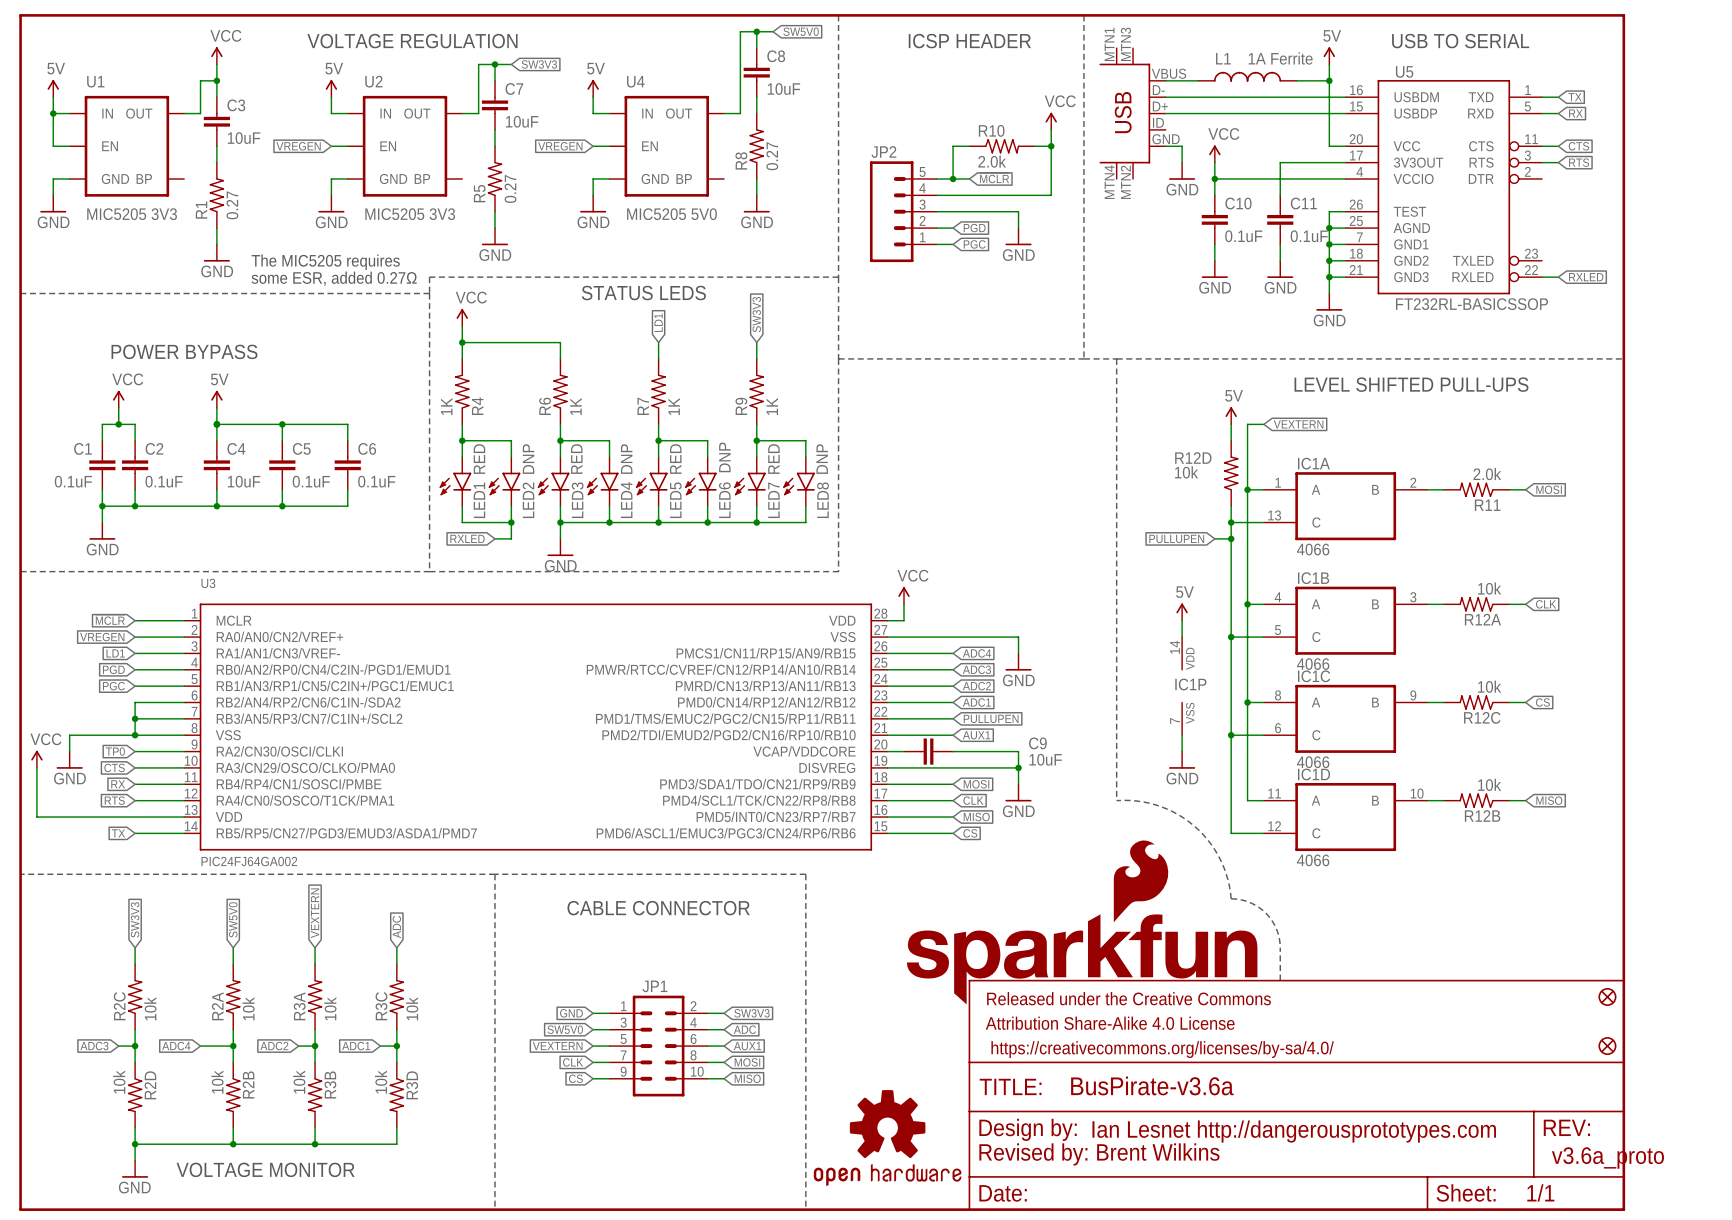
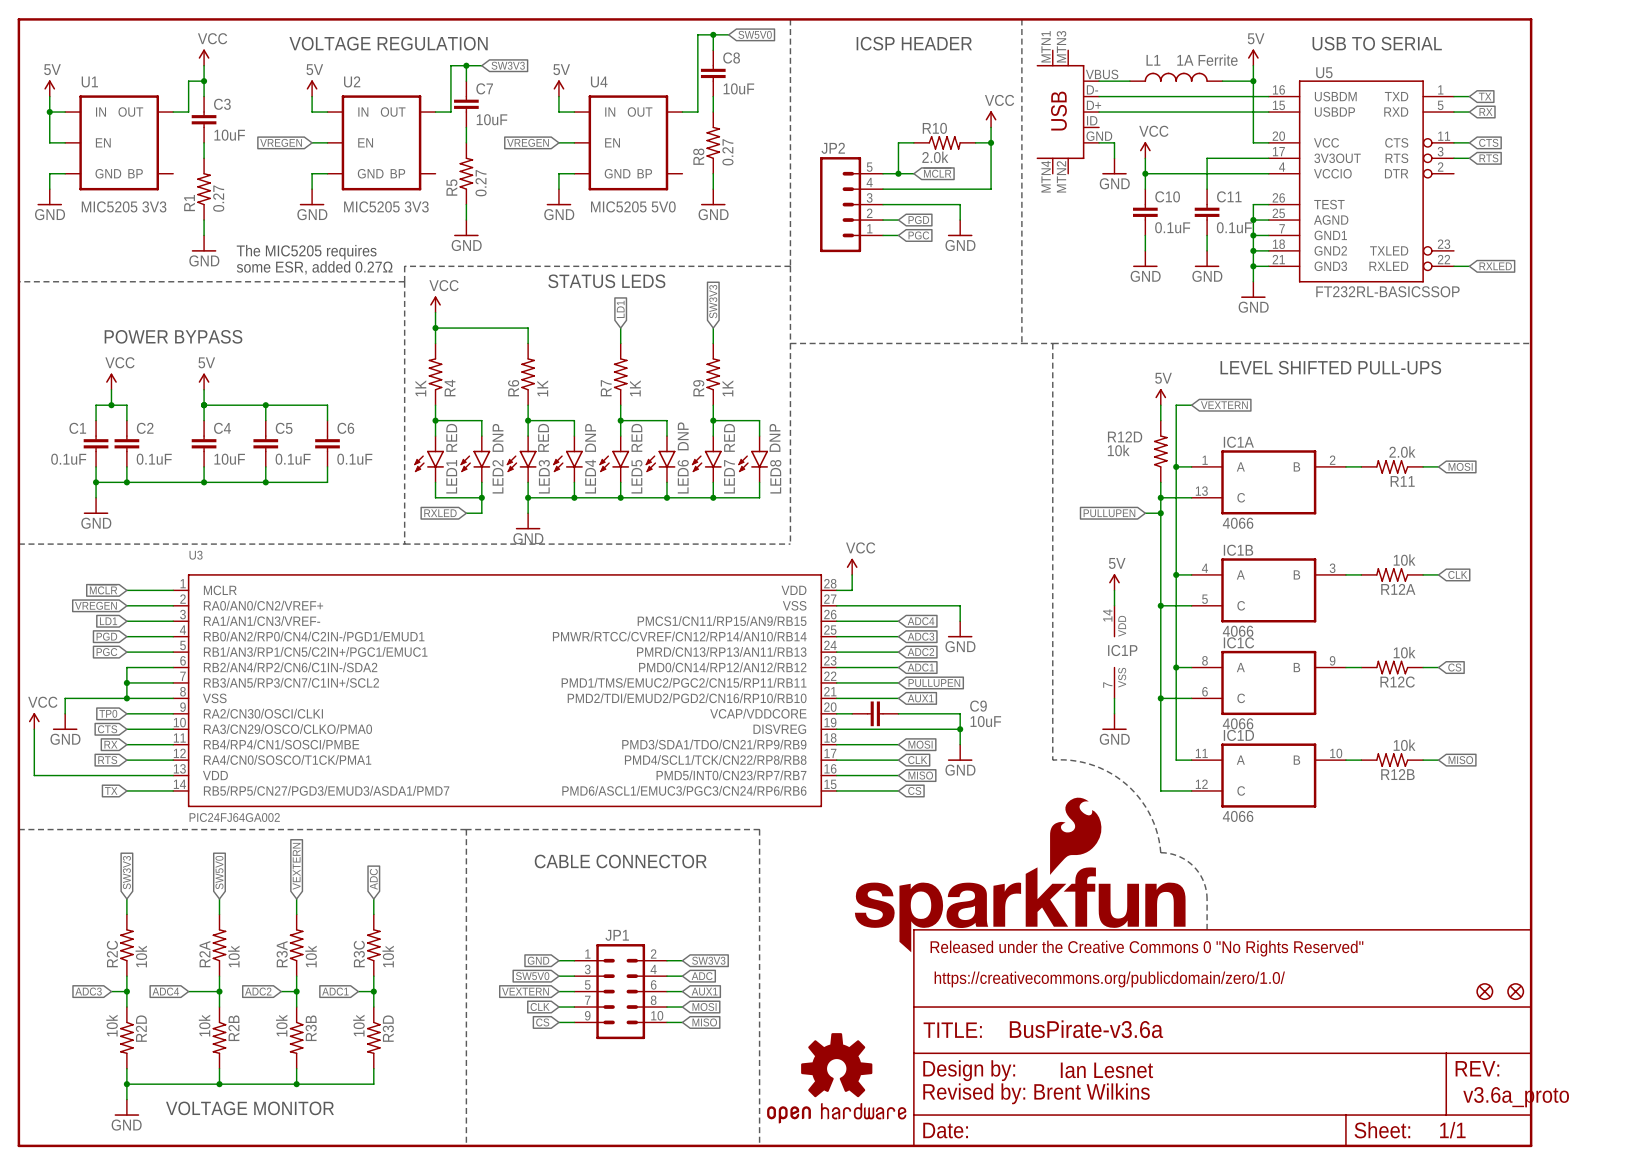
part position: (1607, 996) -> (1484, 991)
text: none -> Released under the Creative Commons 0 "No Rights Reserved" (1146, 948)
text: none -> https://creativecommons.org/publicdomain/zero/1.0/ (1109, 979)
part: (1296, 1095) -> none
text: none -> Ian Lesnet (1106, 1070)
text: Ian Lesnet http://dangerousprototypes.com (1294, 1131) -> none

